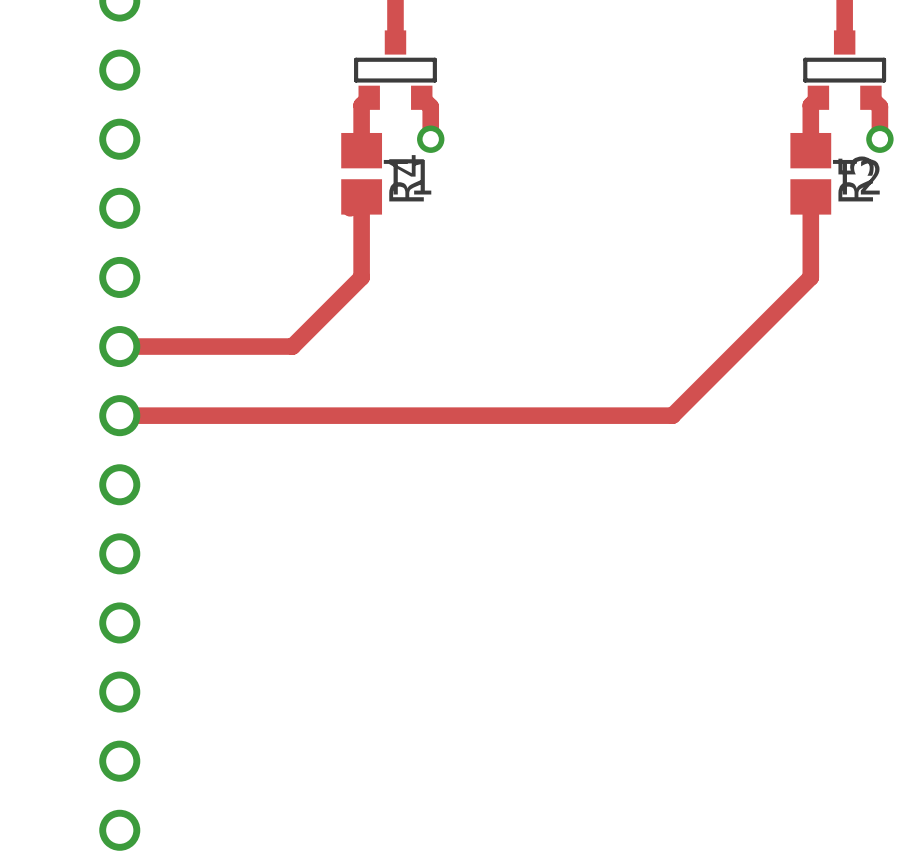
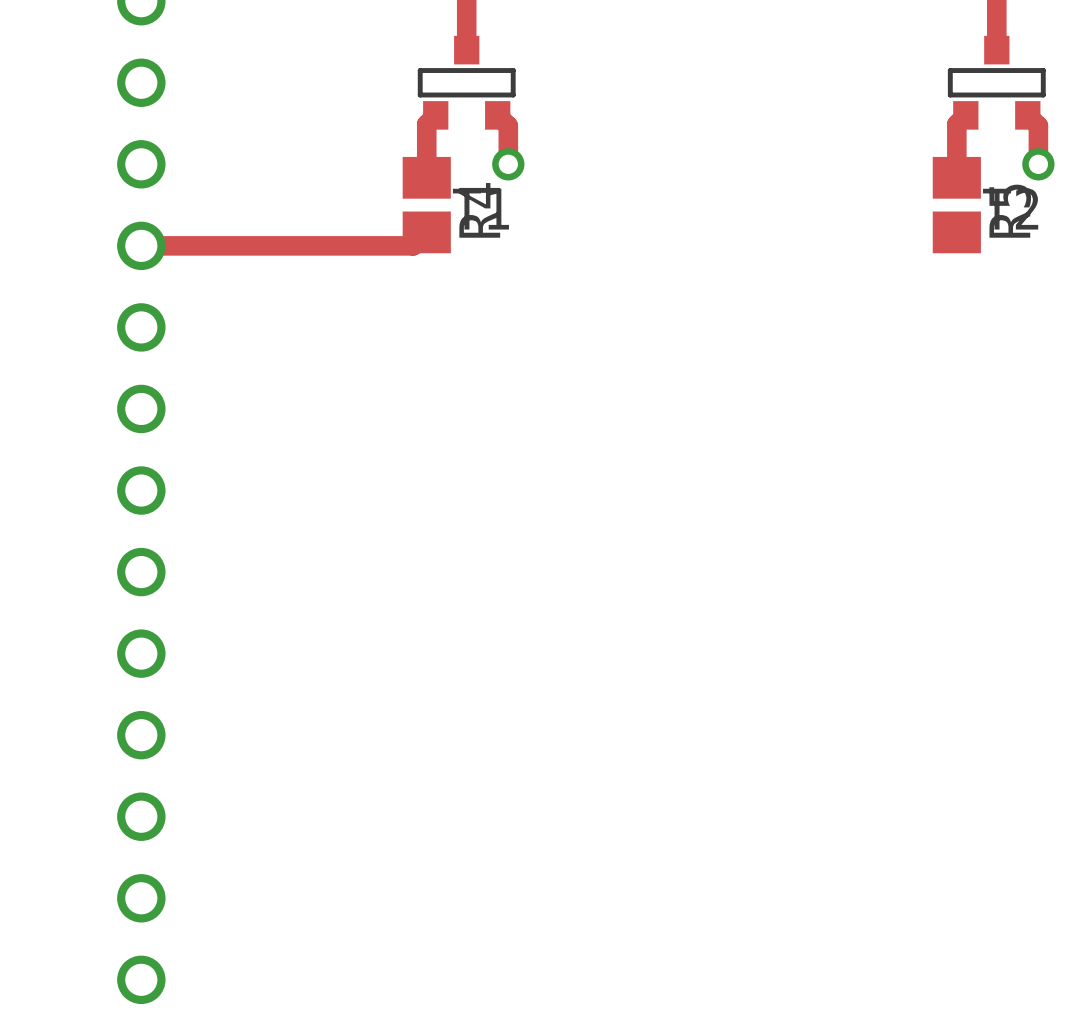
track: (361, 196) (361, 277) (292, 346) (119, 346) -> none
track: (810, 196) (810, 277) (672, 415) (119, 415) -> none
track: none -> (141, 245) (413, 245)

